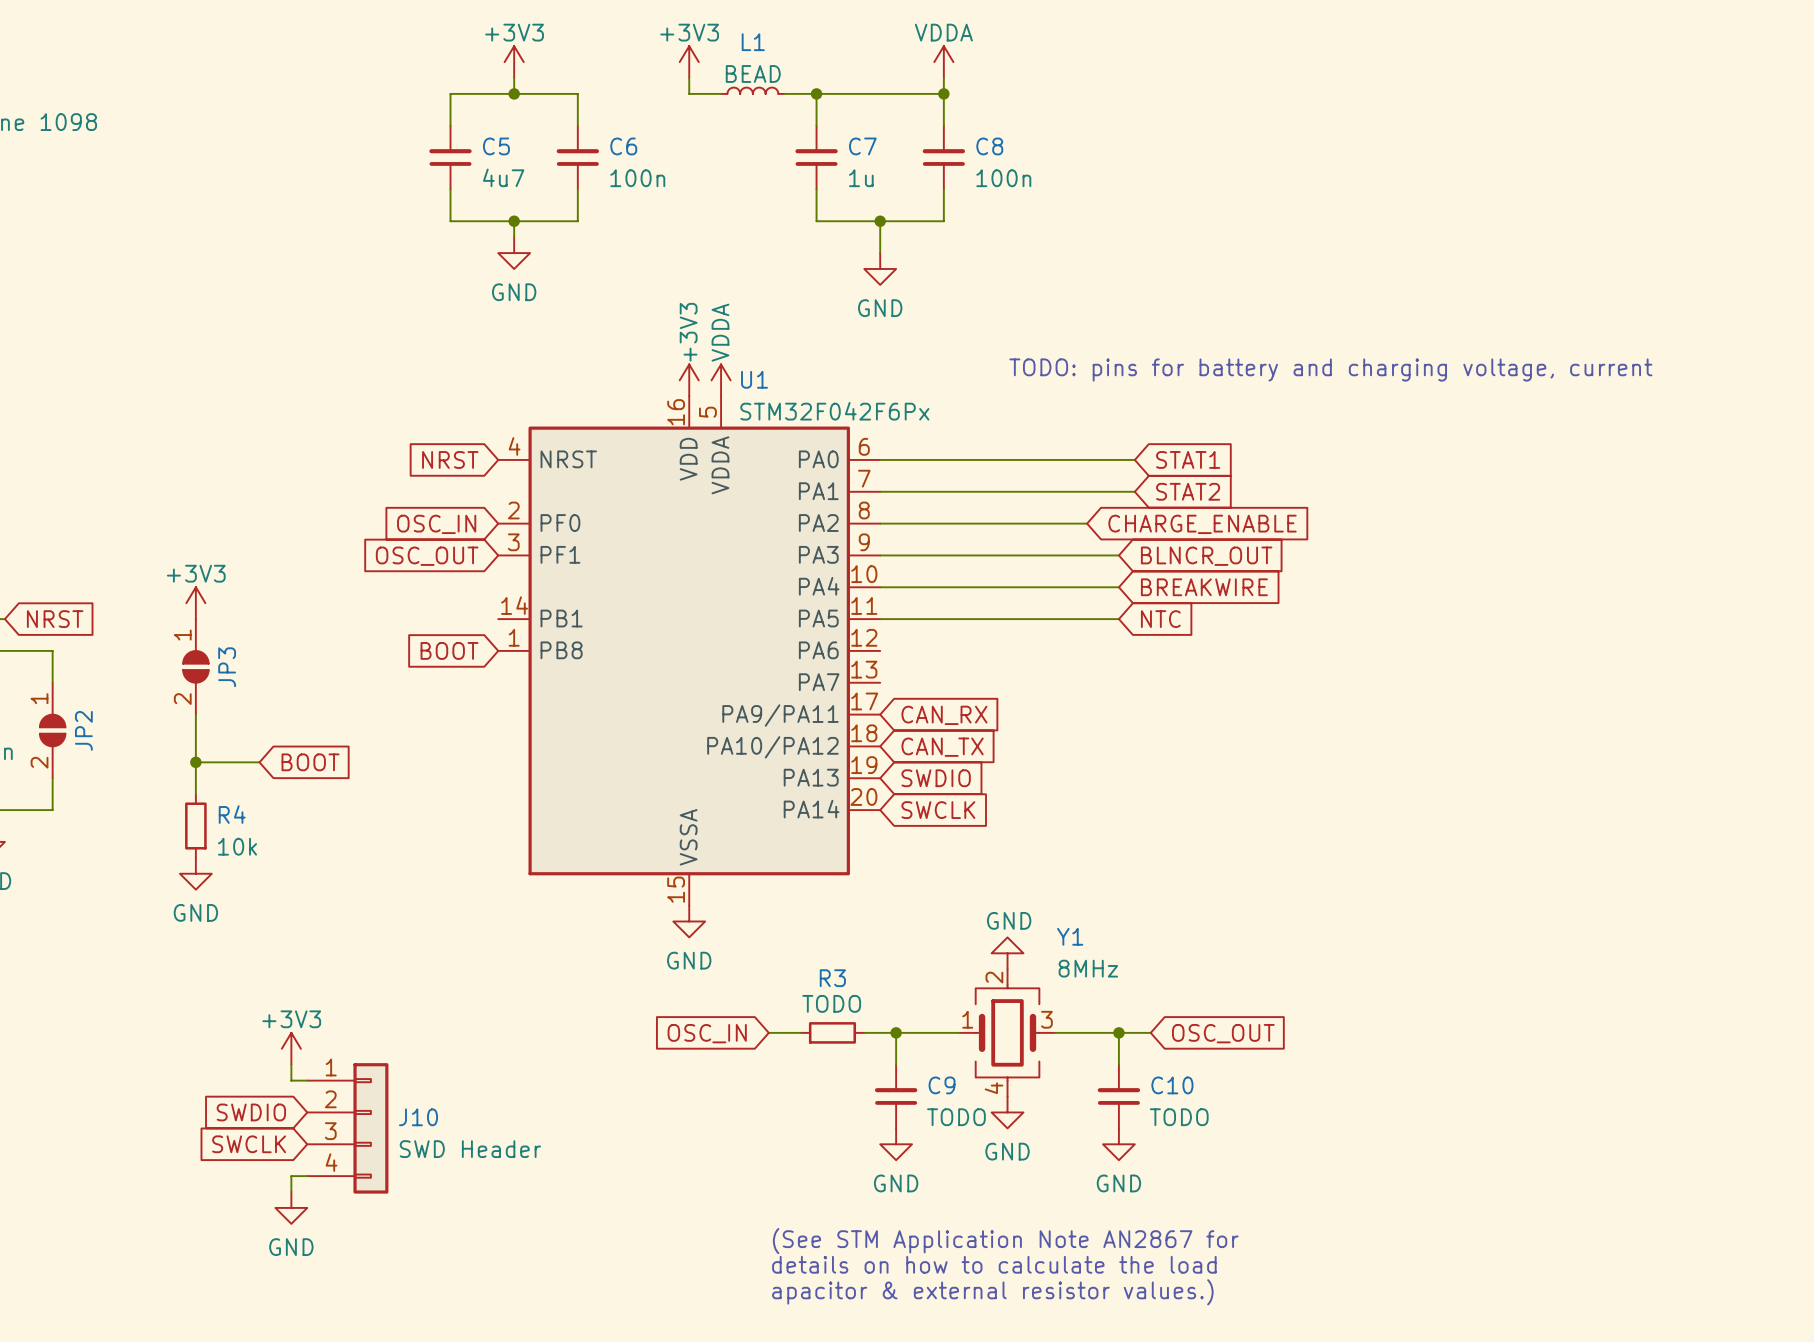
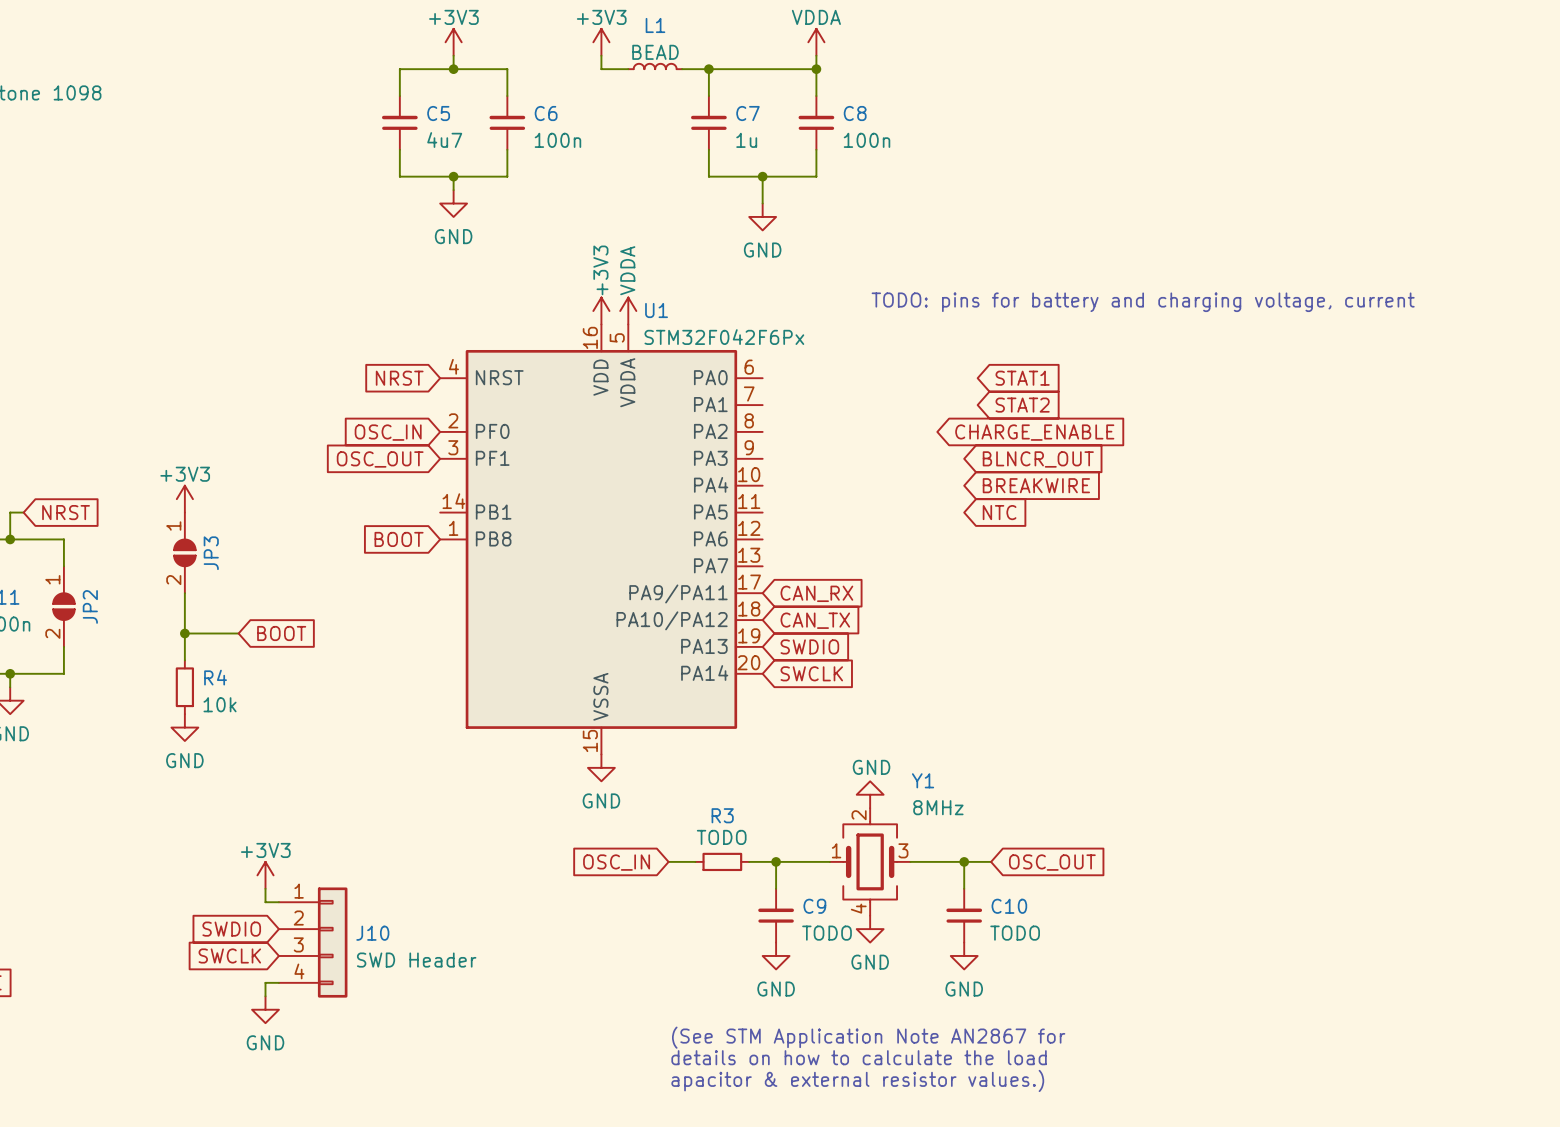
wire: (880, 459) (1134, 459) -> none
wire: (880, 491) (1134, 491) -> none
wire: (880, 523) (1087, 523) -> none
wire: (880, 555) (1118, 555) -> none
wire: (880, 587) (1118, 587) -> none
wire: (880, 619) (1118, 619) -> none

